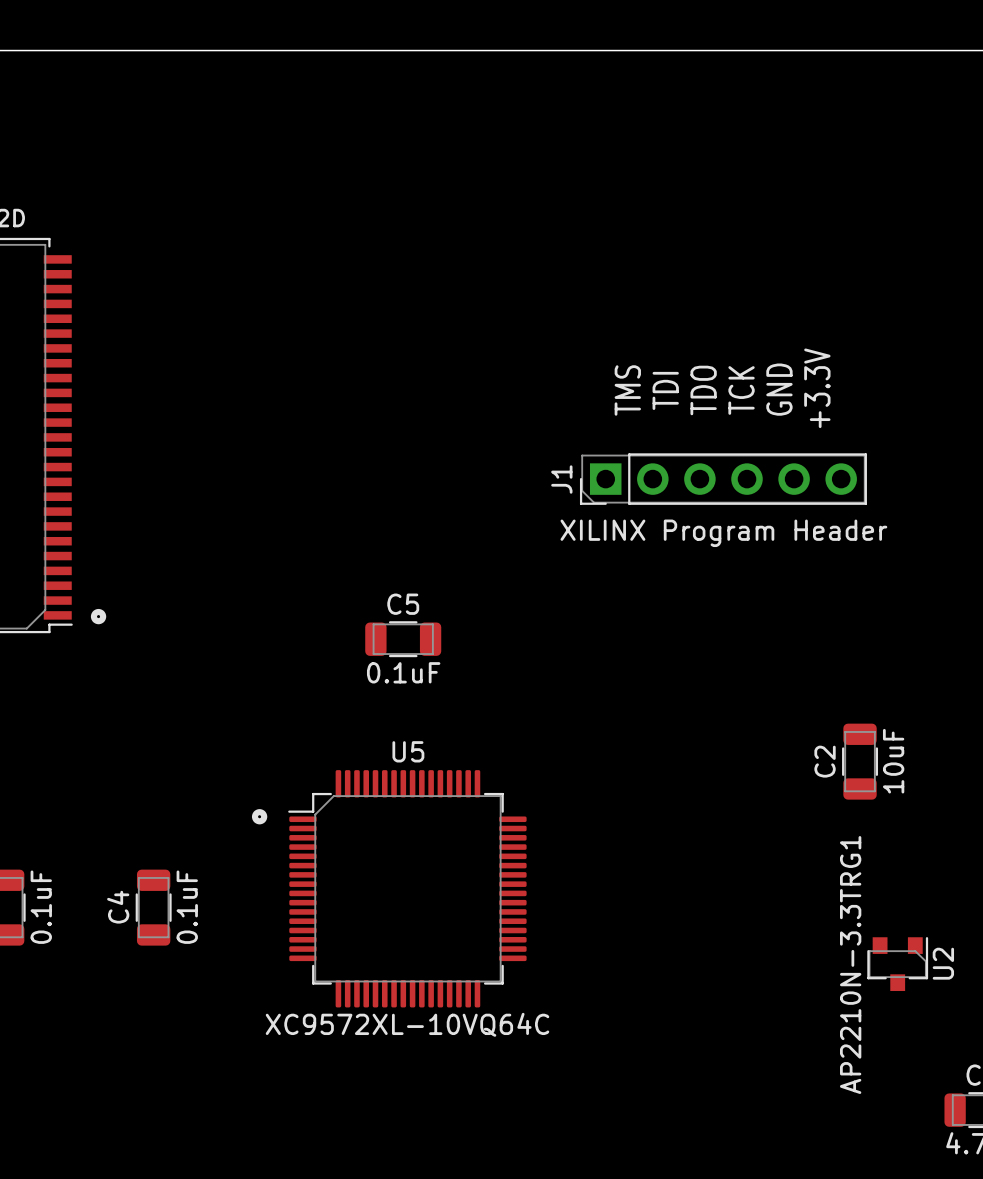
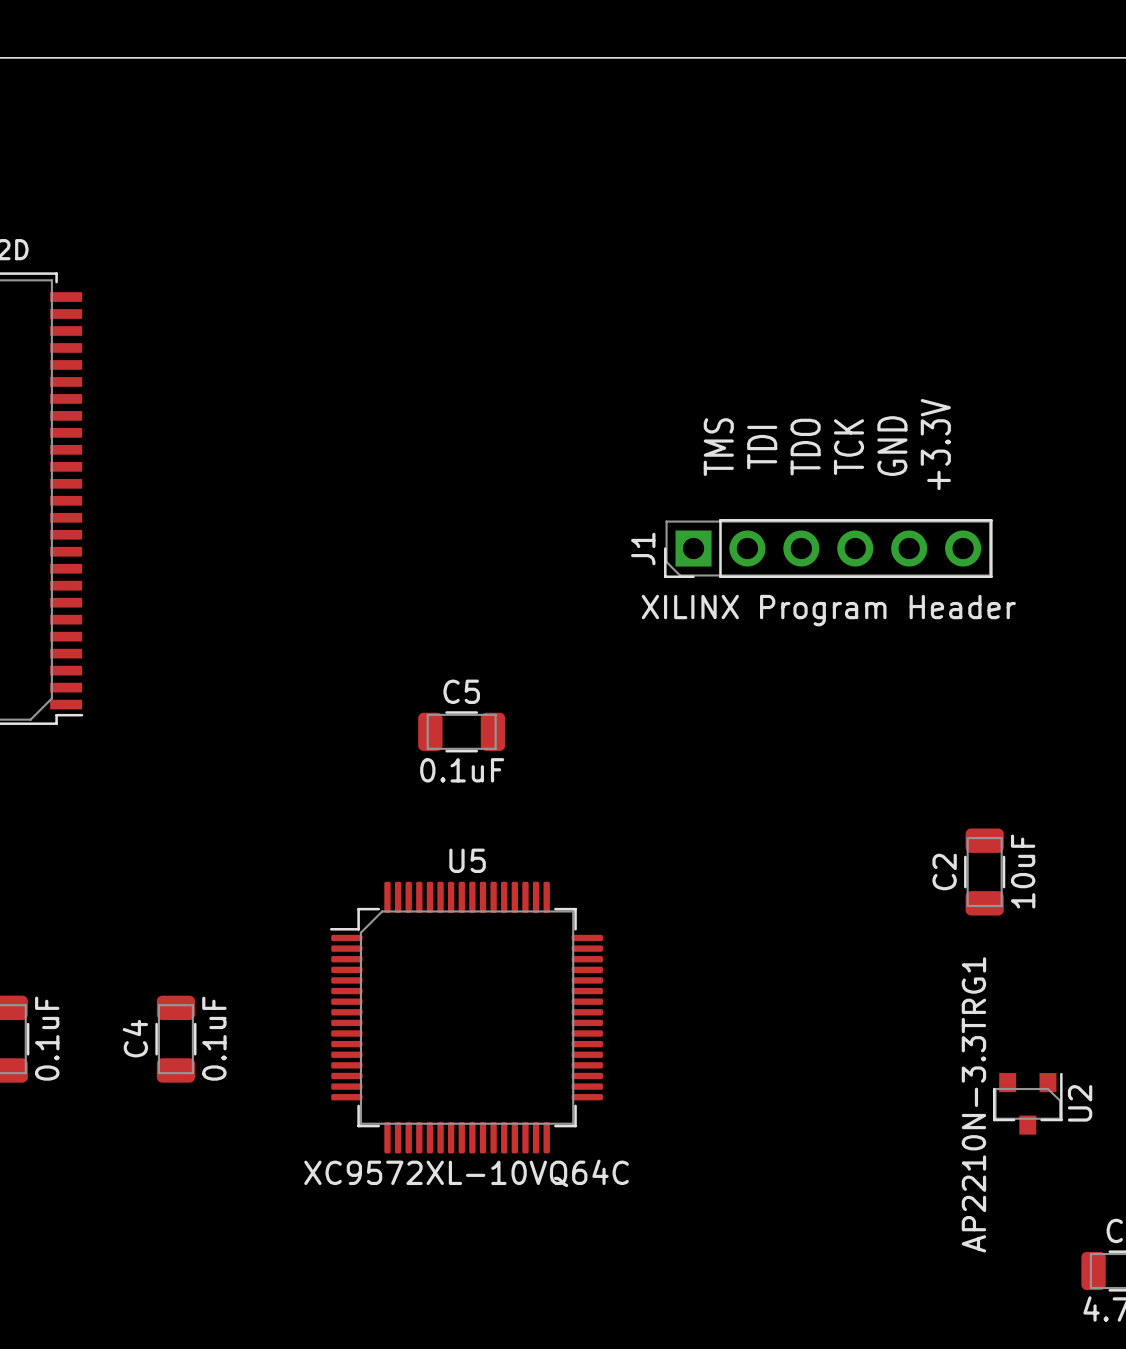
drawing: [90, 608, 107, 625] -> none
drawing: [251, 809, 268, 825] -> none

